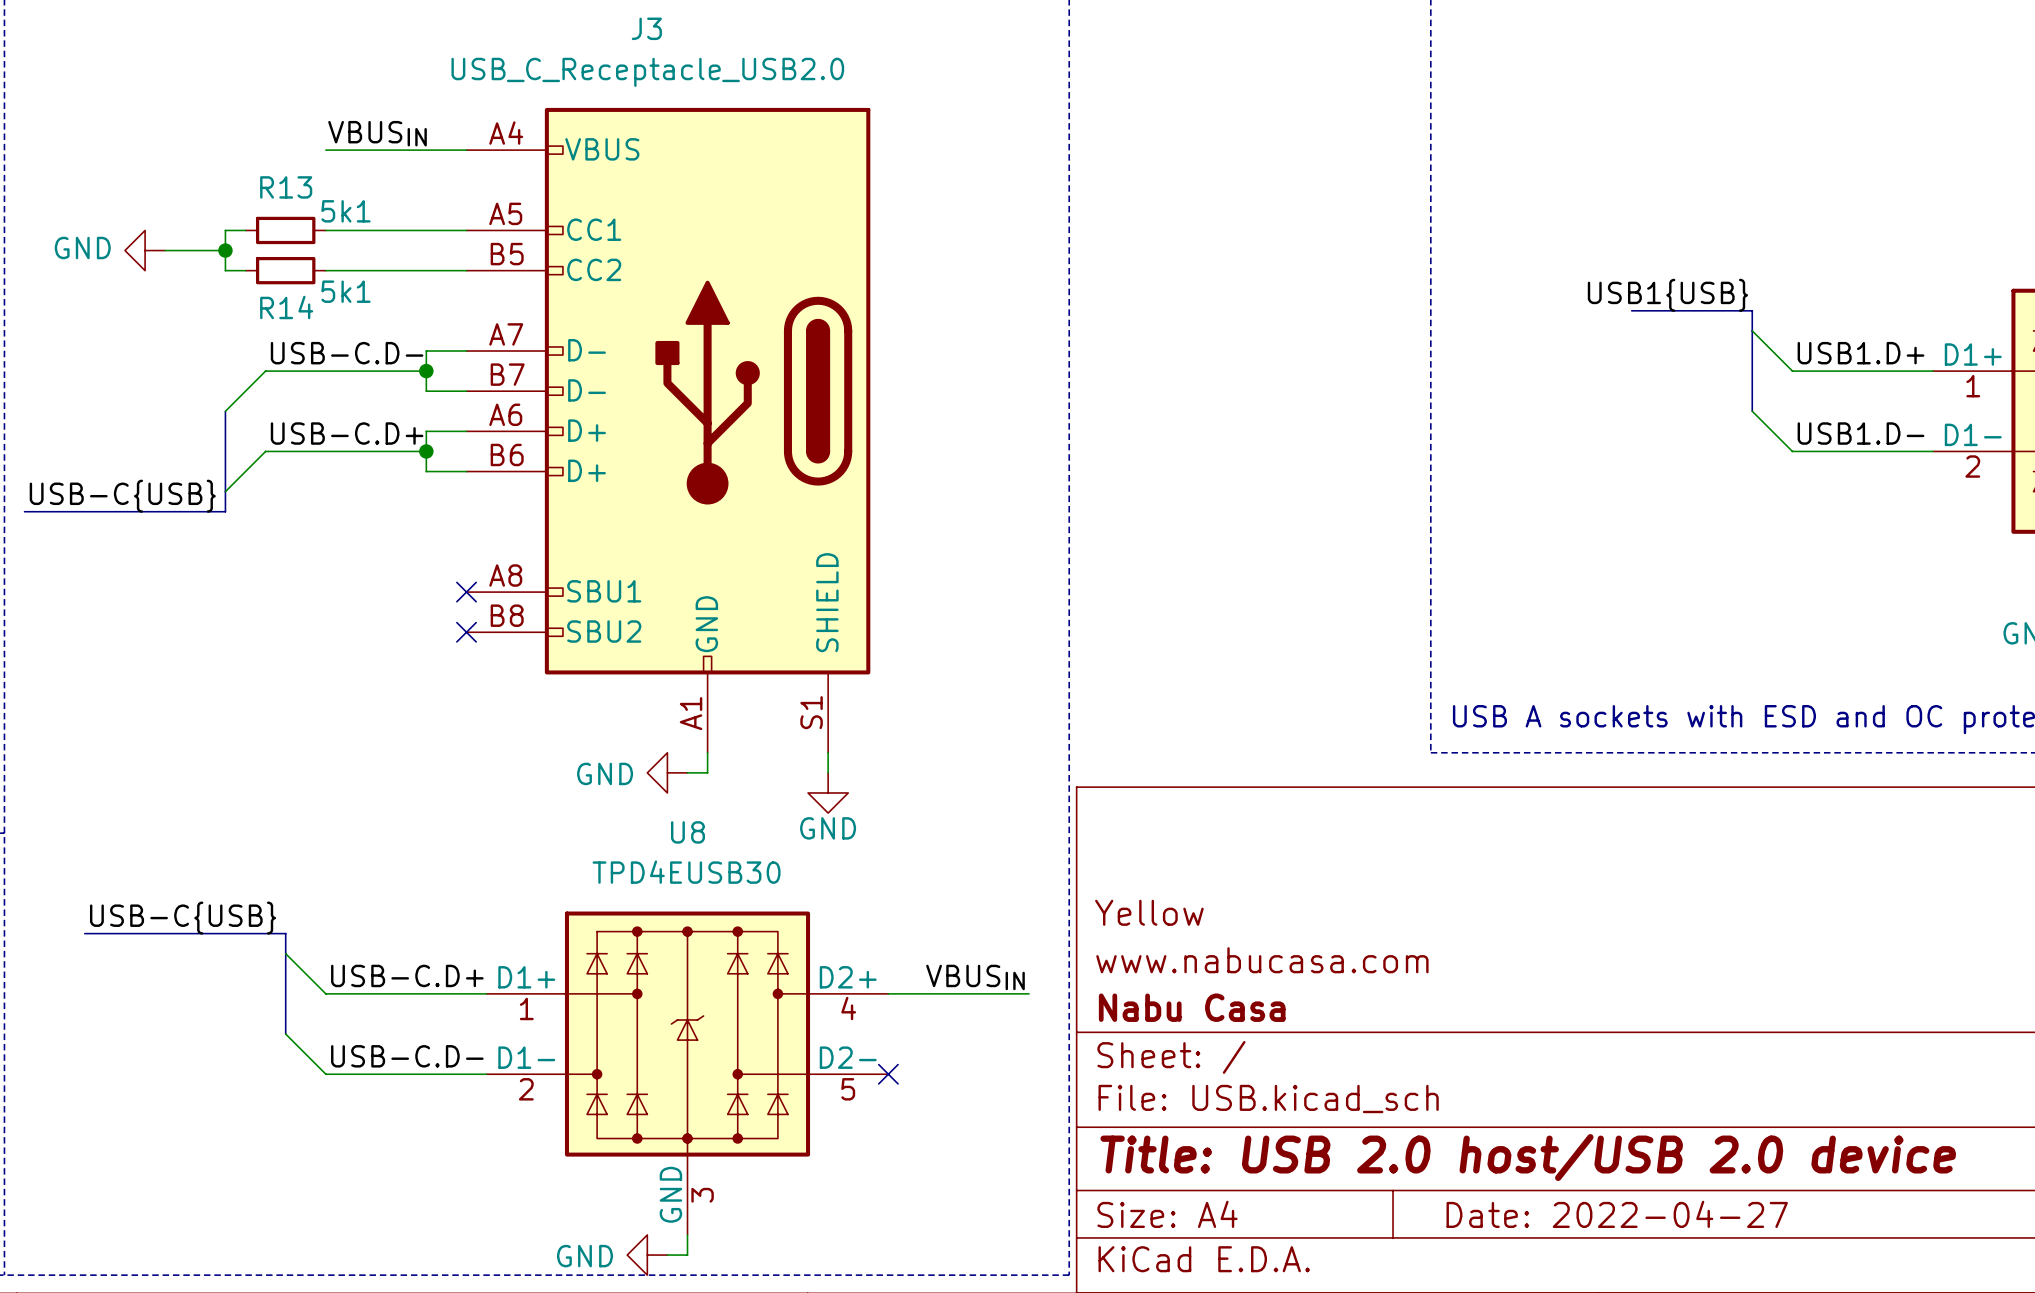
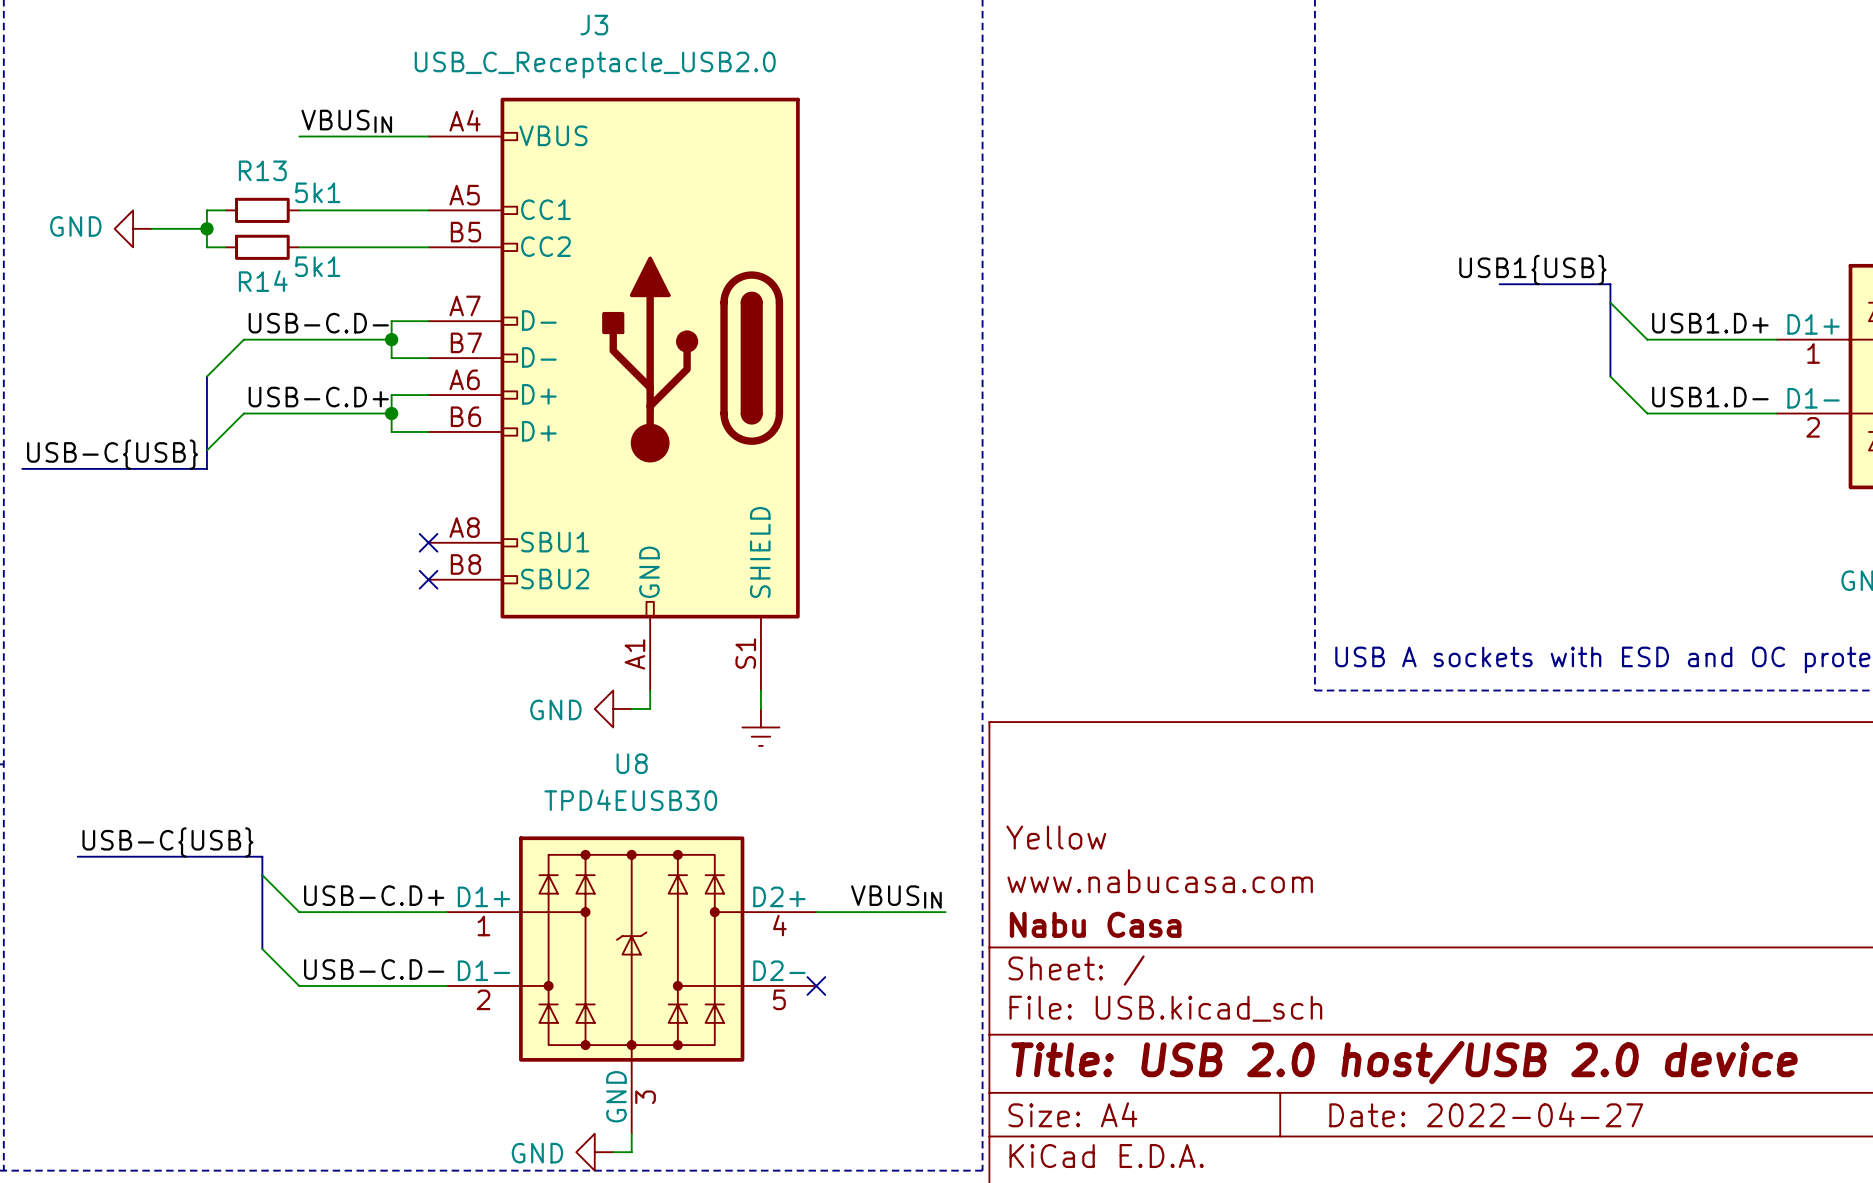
power symbol shape: [808, 772, 849, 814] -> [742, 708, 780, 746]
power symbol text: GND (828, 828) -> none

